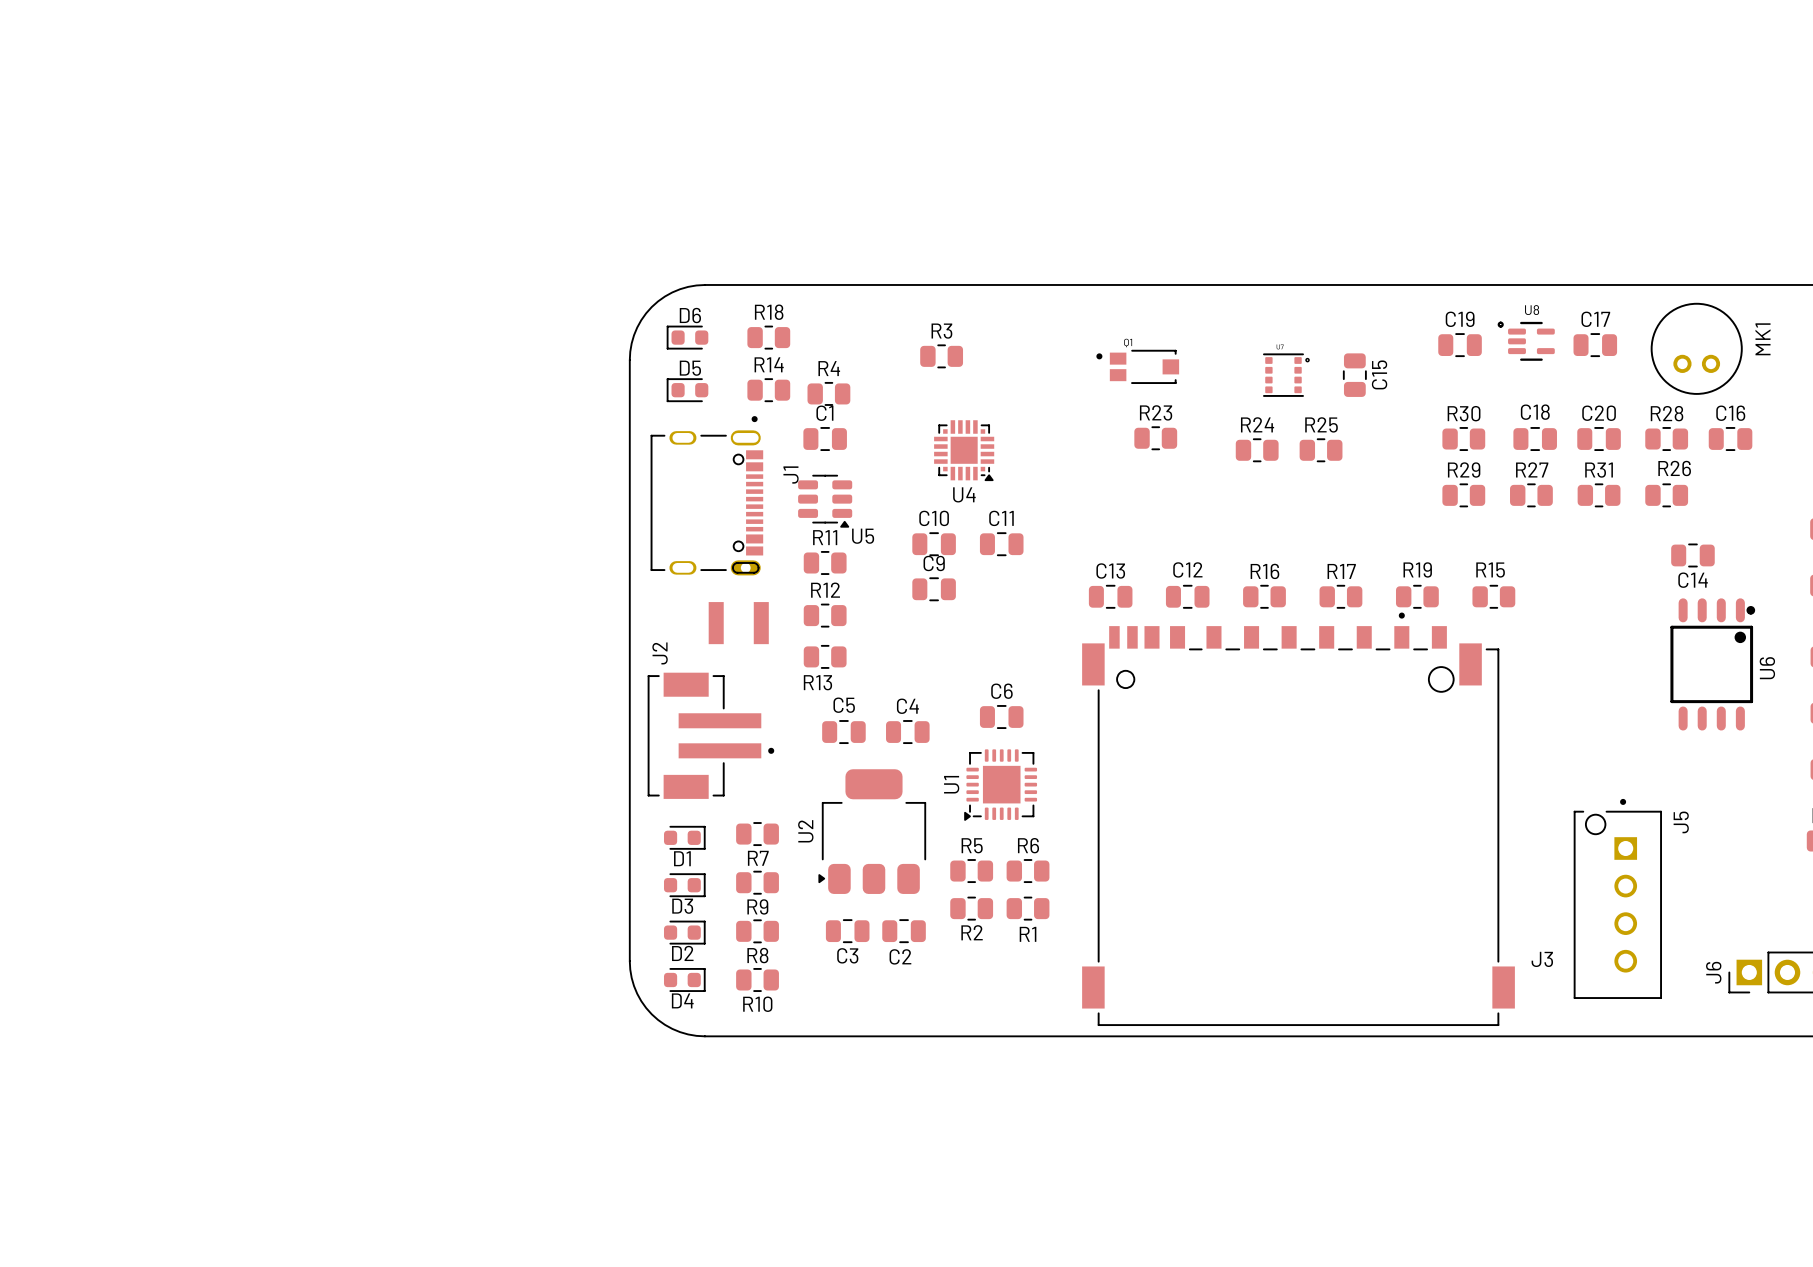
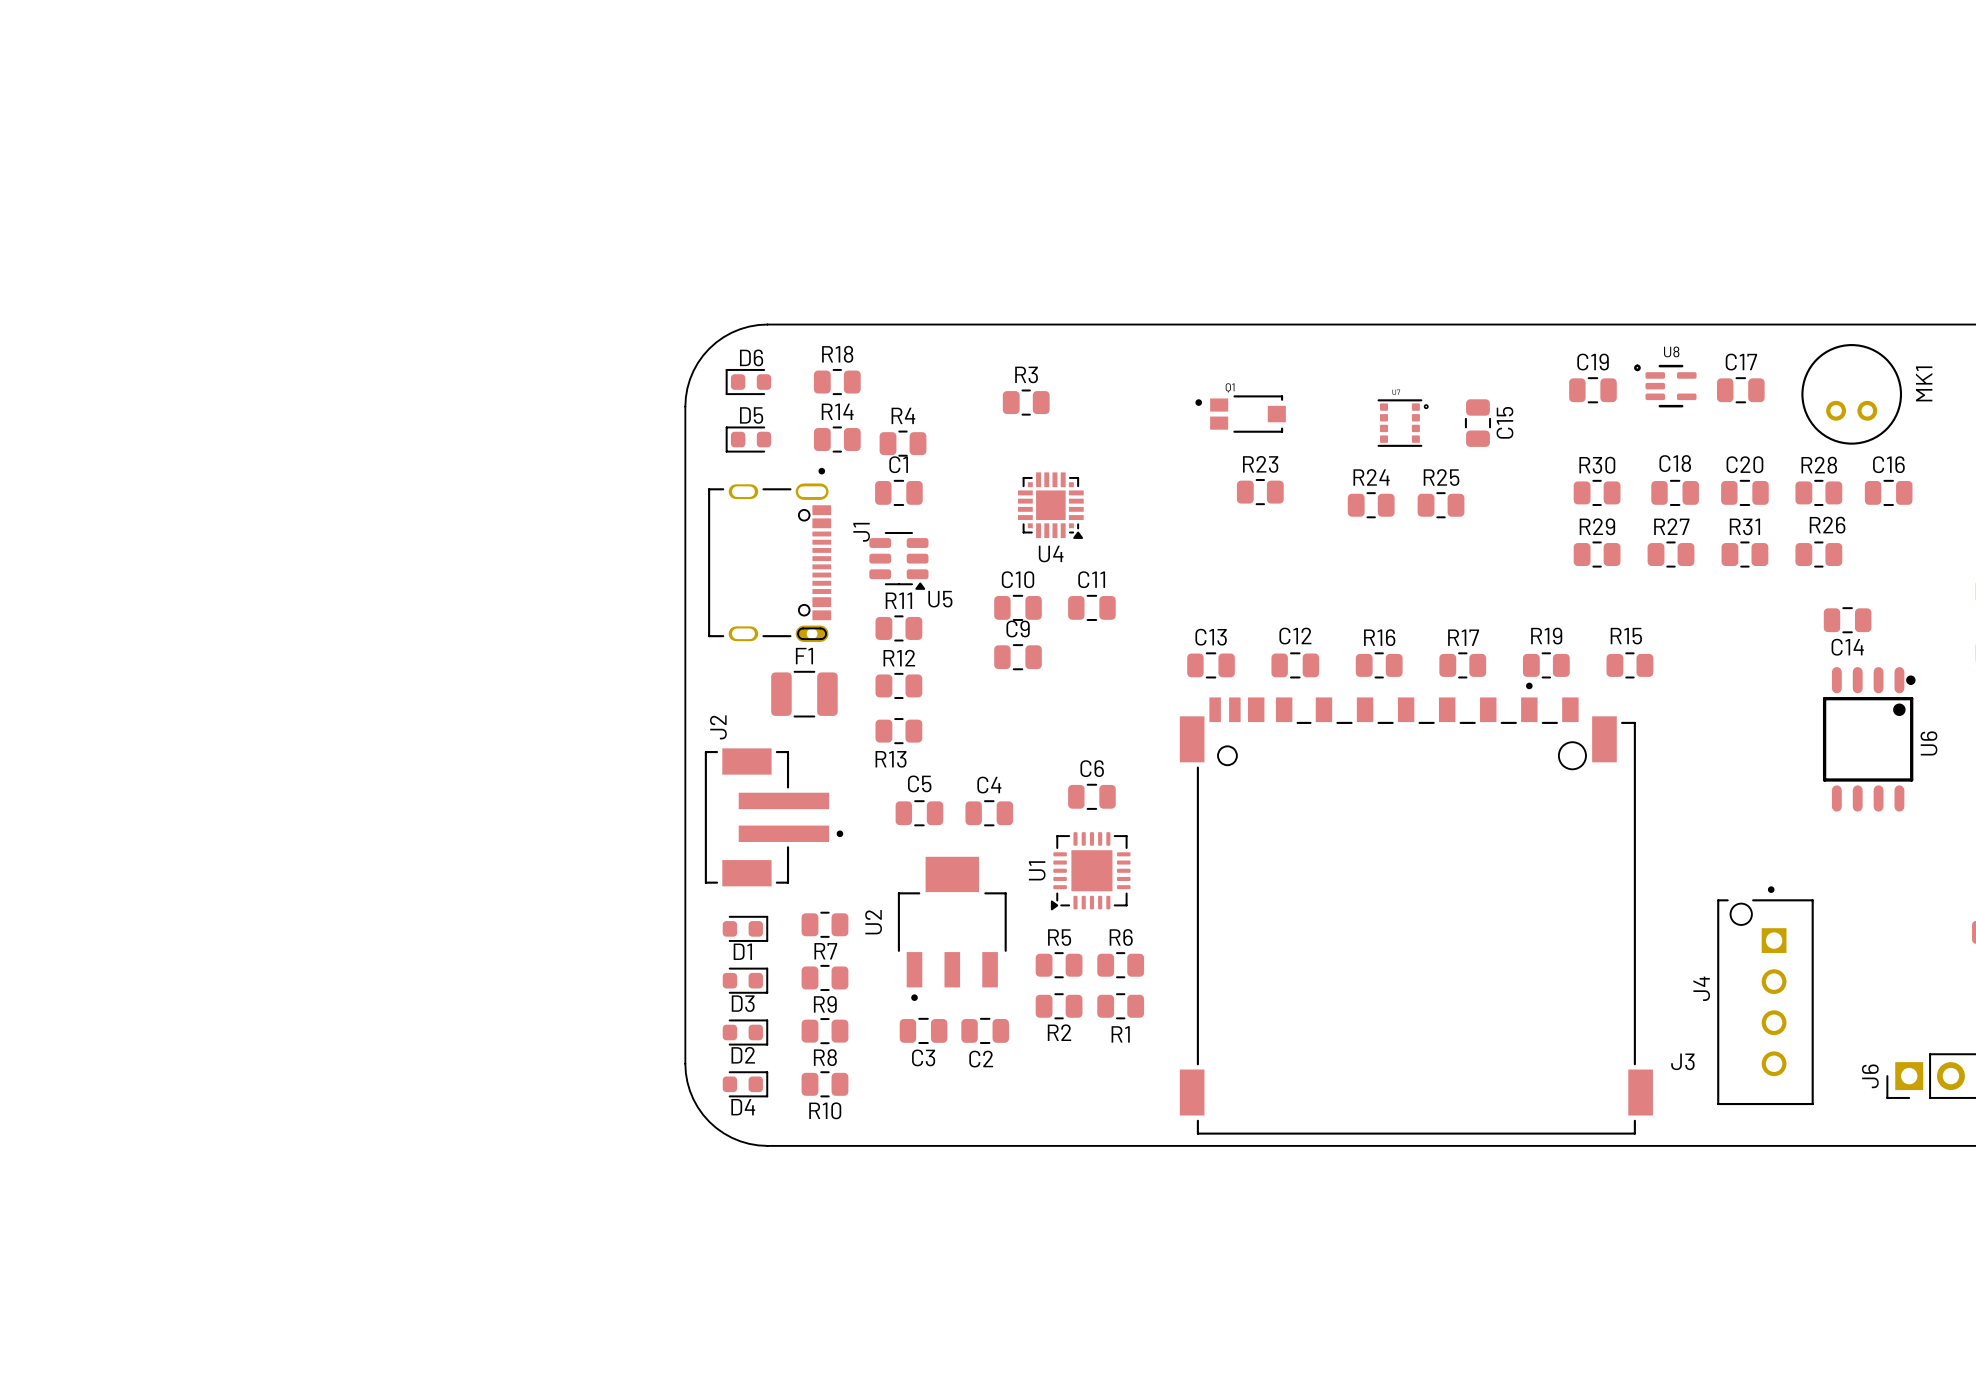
part: (738, 623) -> none
F1: none -> (804, 694)
U2 footprint: [818, 769, 927, 894] -> [897, 856, 1007, 1001]
J5 name: J5 (1681, 822) -> J4 (1701, 988)

